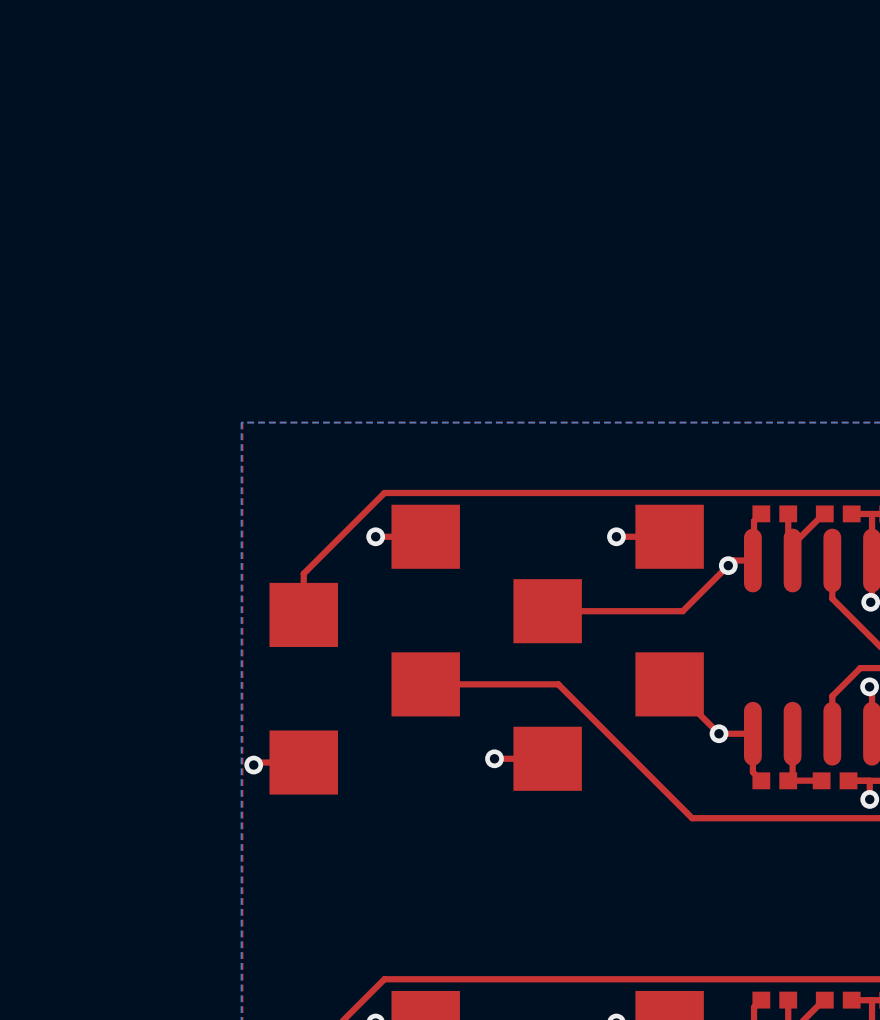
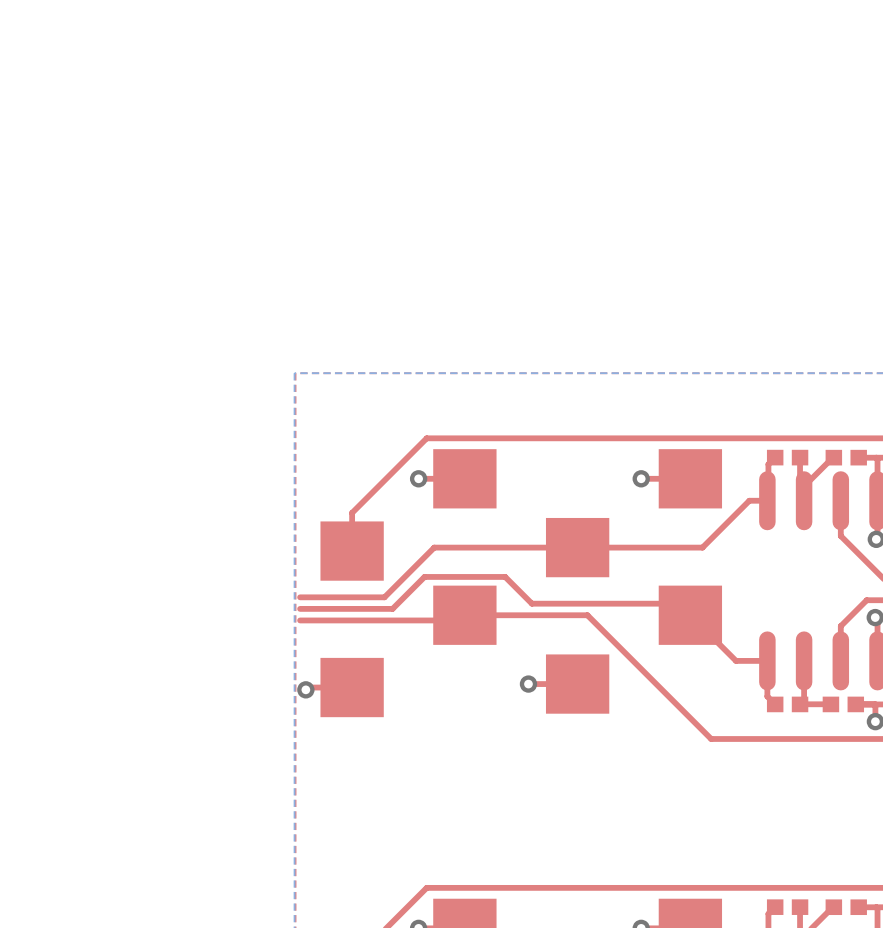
via: (728, 565) -> none
top track: none -> (577, 547) (434, 547) (384, 597) (300, 597)
top track: none -> (300, 608) (392, 608) (424, 576) (505, 576) (531, 603) (678, 603) (690, 615)
top track: none -> (464, 615) (459, 620) (300, 620)
via: (719, 733) -> none

